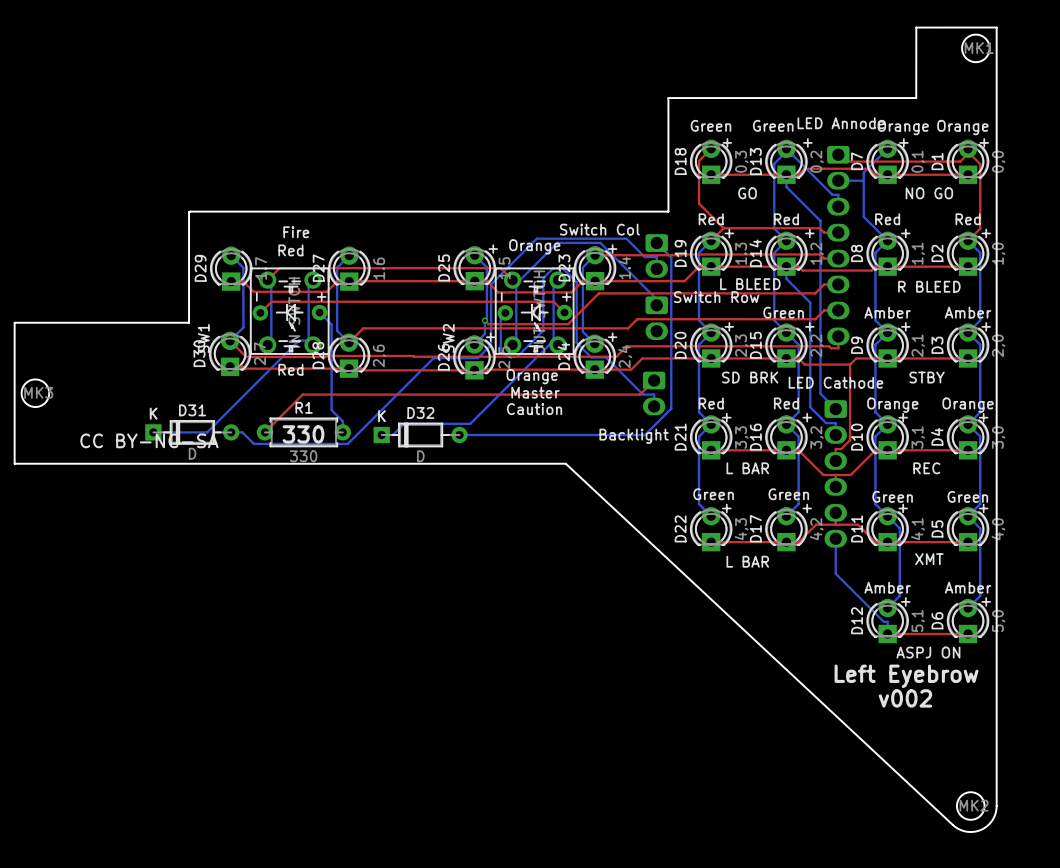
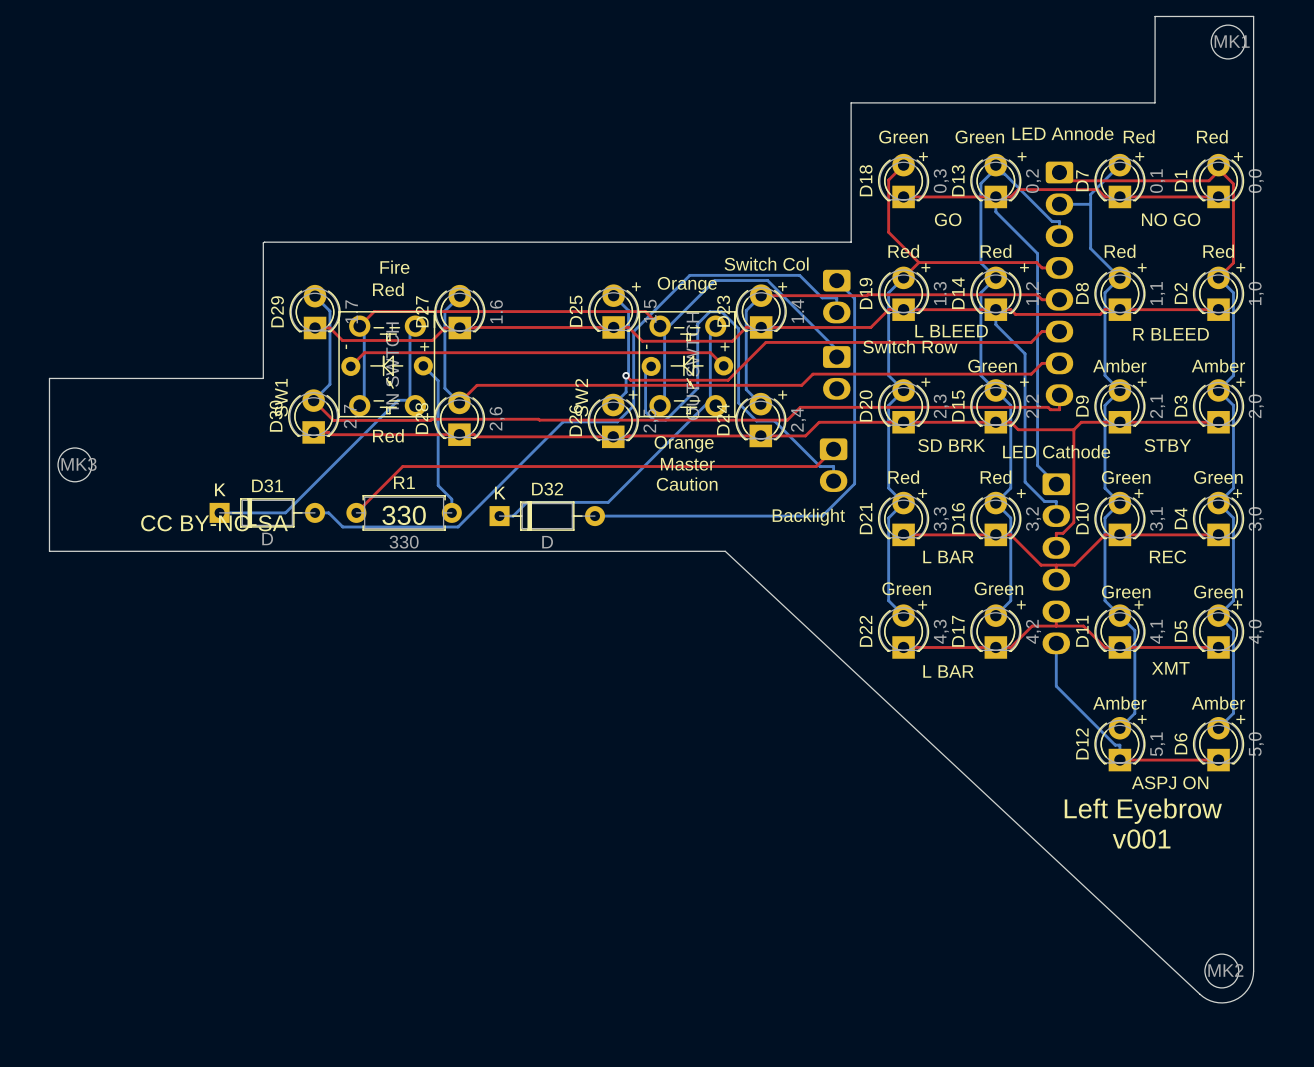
text: Orange (903, 127) -> Red (1139, 136)
text: Orange (962, 127) -> Red (1212, 136)
text: Orange (892, 405) -> Green (1126, 477)
text: Orange (968, 405) -> Green (1218, 477)
text: v002 (905, 698) -> v001 (1141, 839)

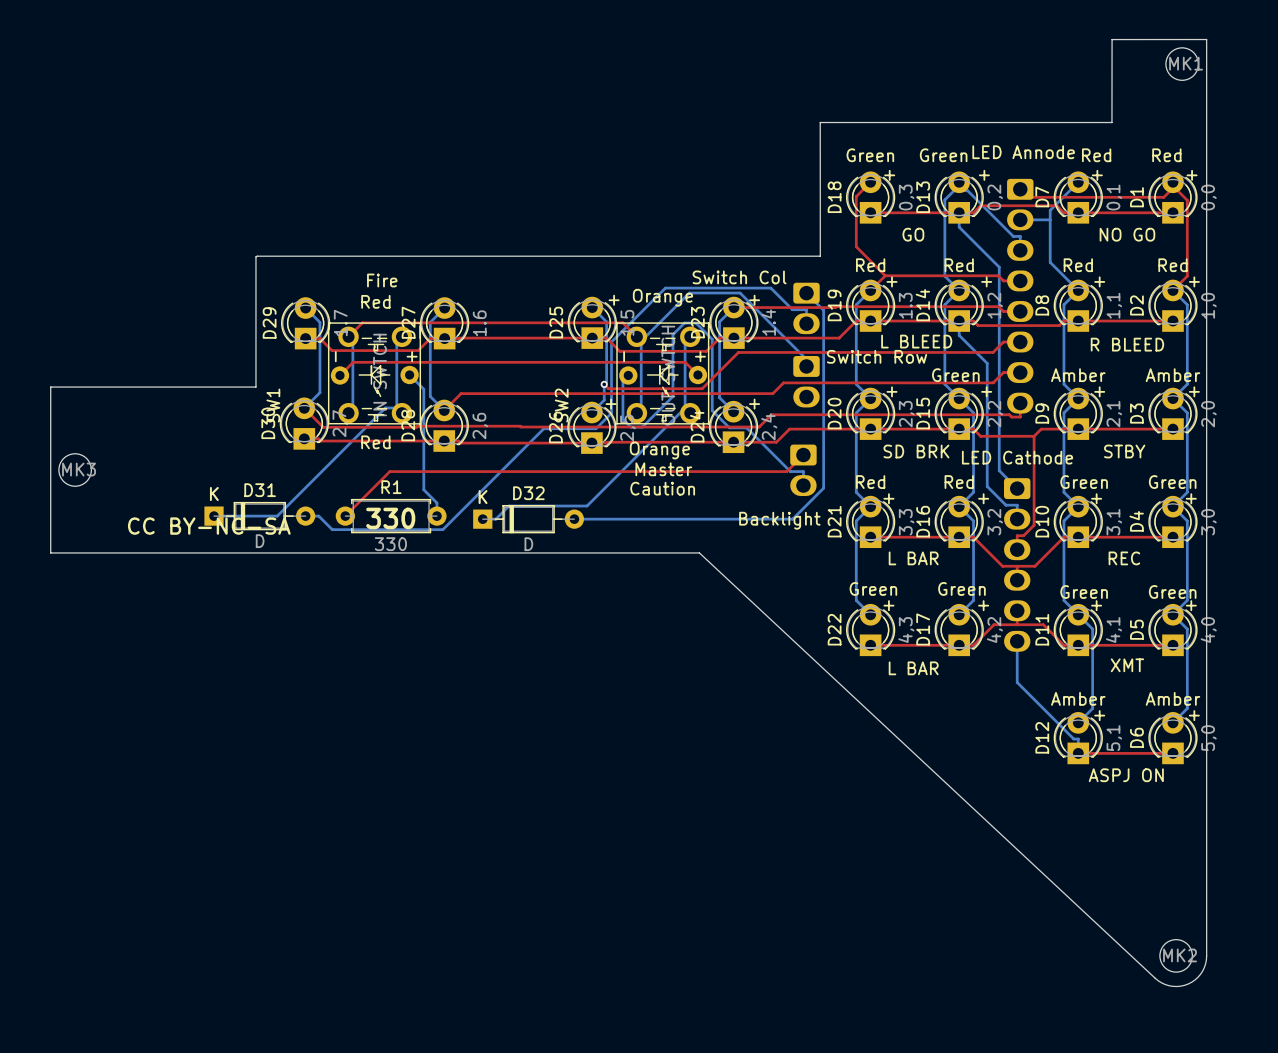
text: Left Eyebrow (1143, 811) -> none
text: v001 (1141, 839) -> none

